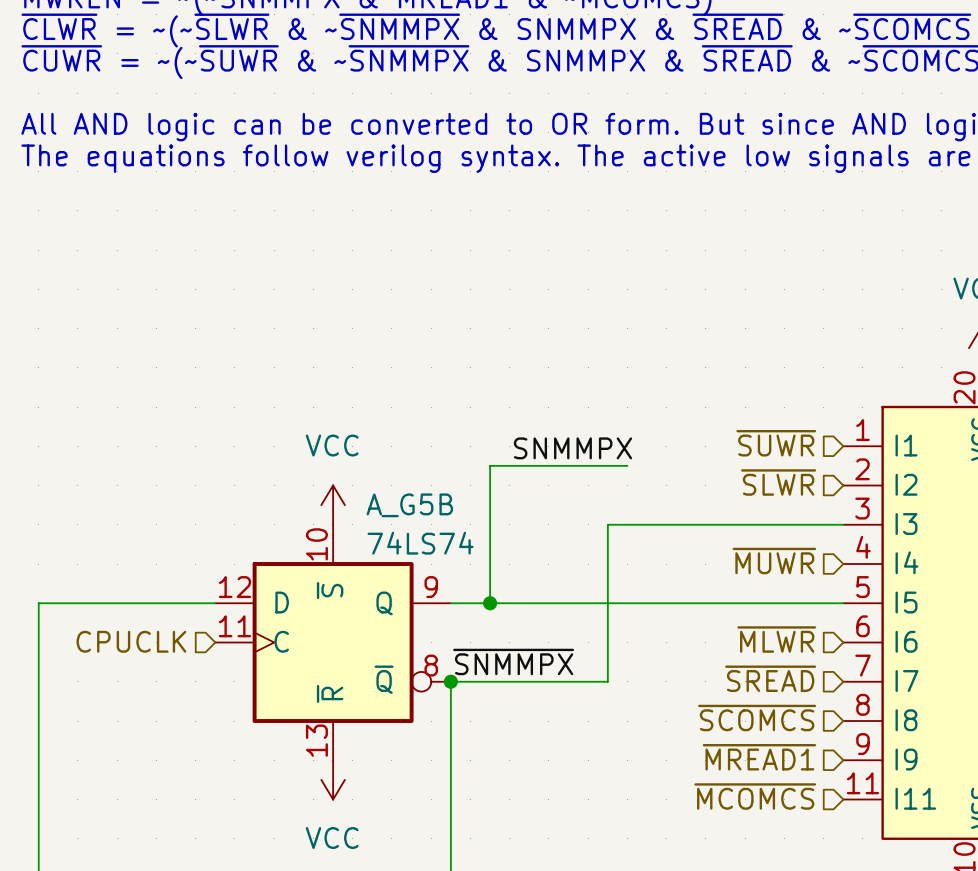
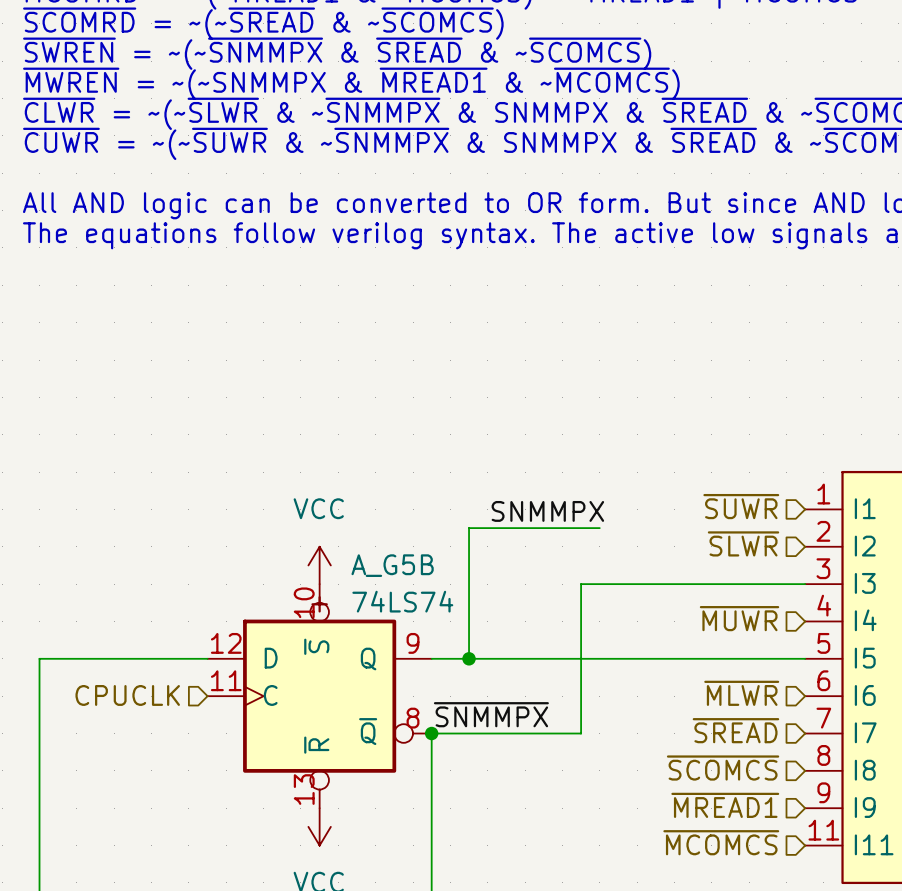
A_G5B symbol: [215, 524, 451, 761] -> [207, 584, 432, 809]

